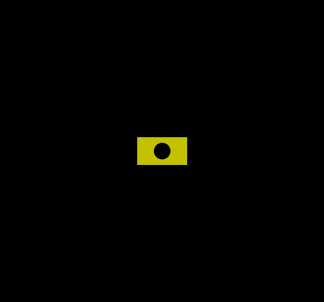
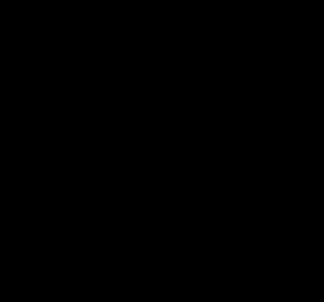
part: (162, 151) -> none

